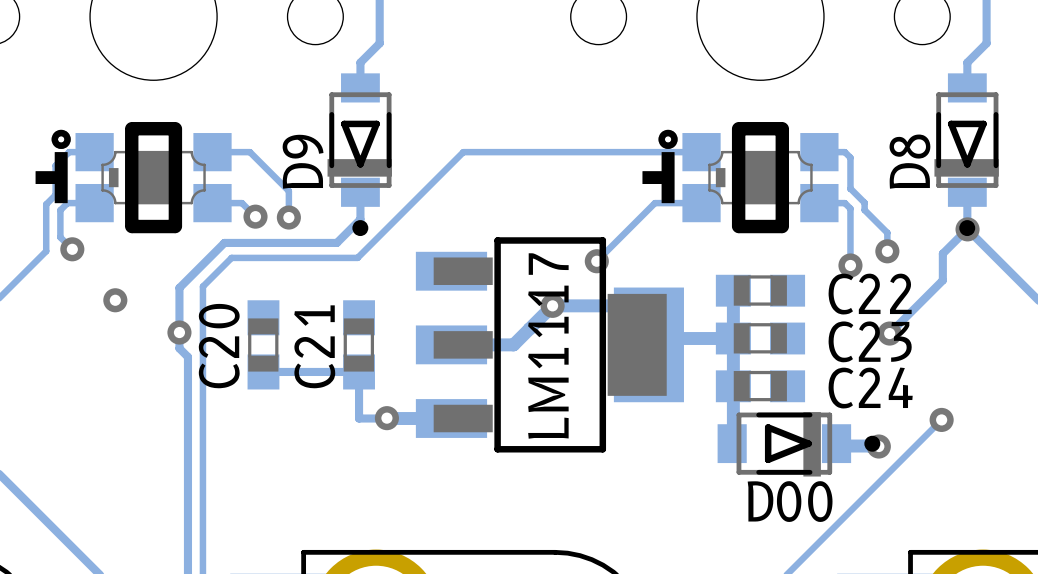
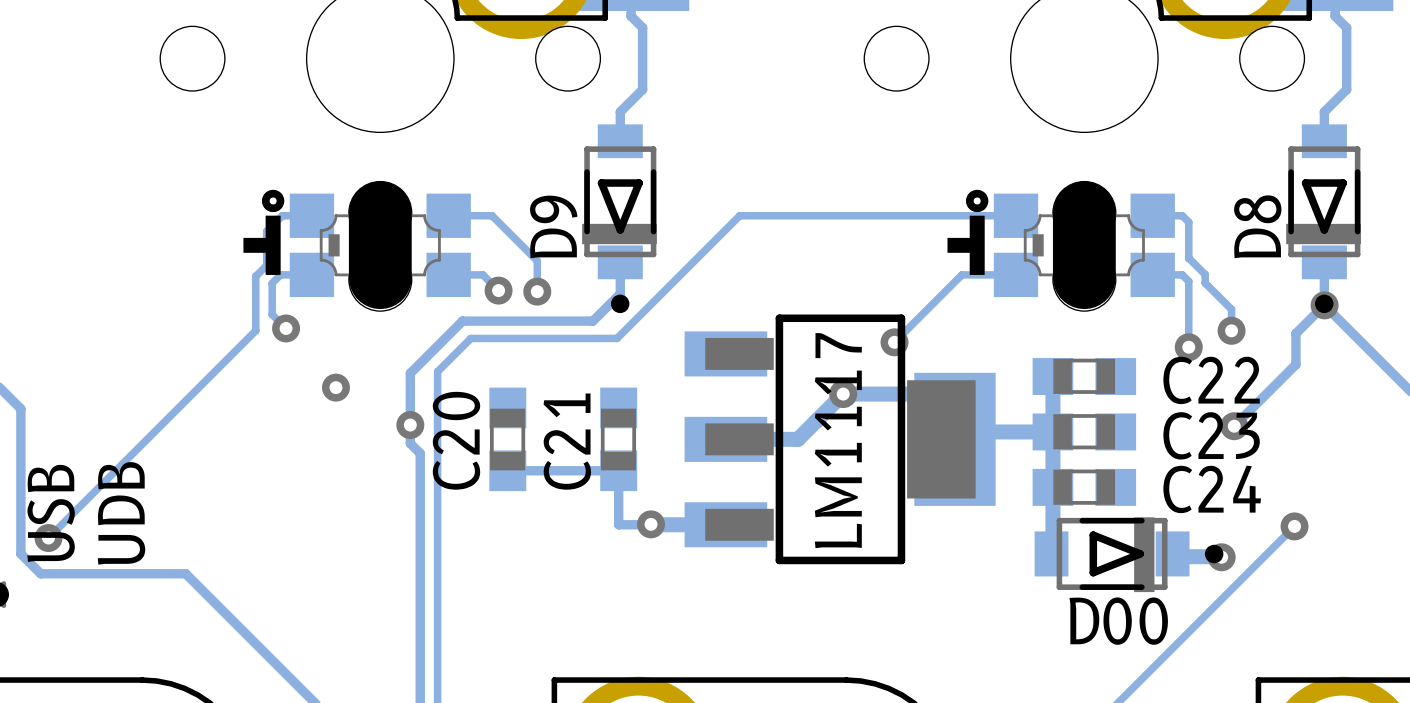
part footprint: [35, 122, 232, 233] -> [243, 181, 471, 312]
part footprint: [642, 122, 839, 233] -> [947, 181, 1175, 312]

